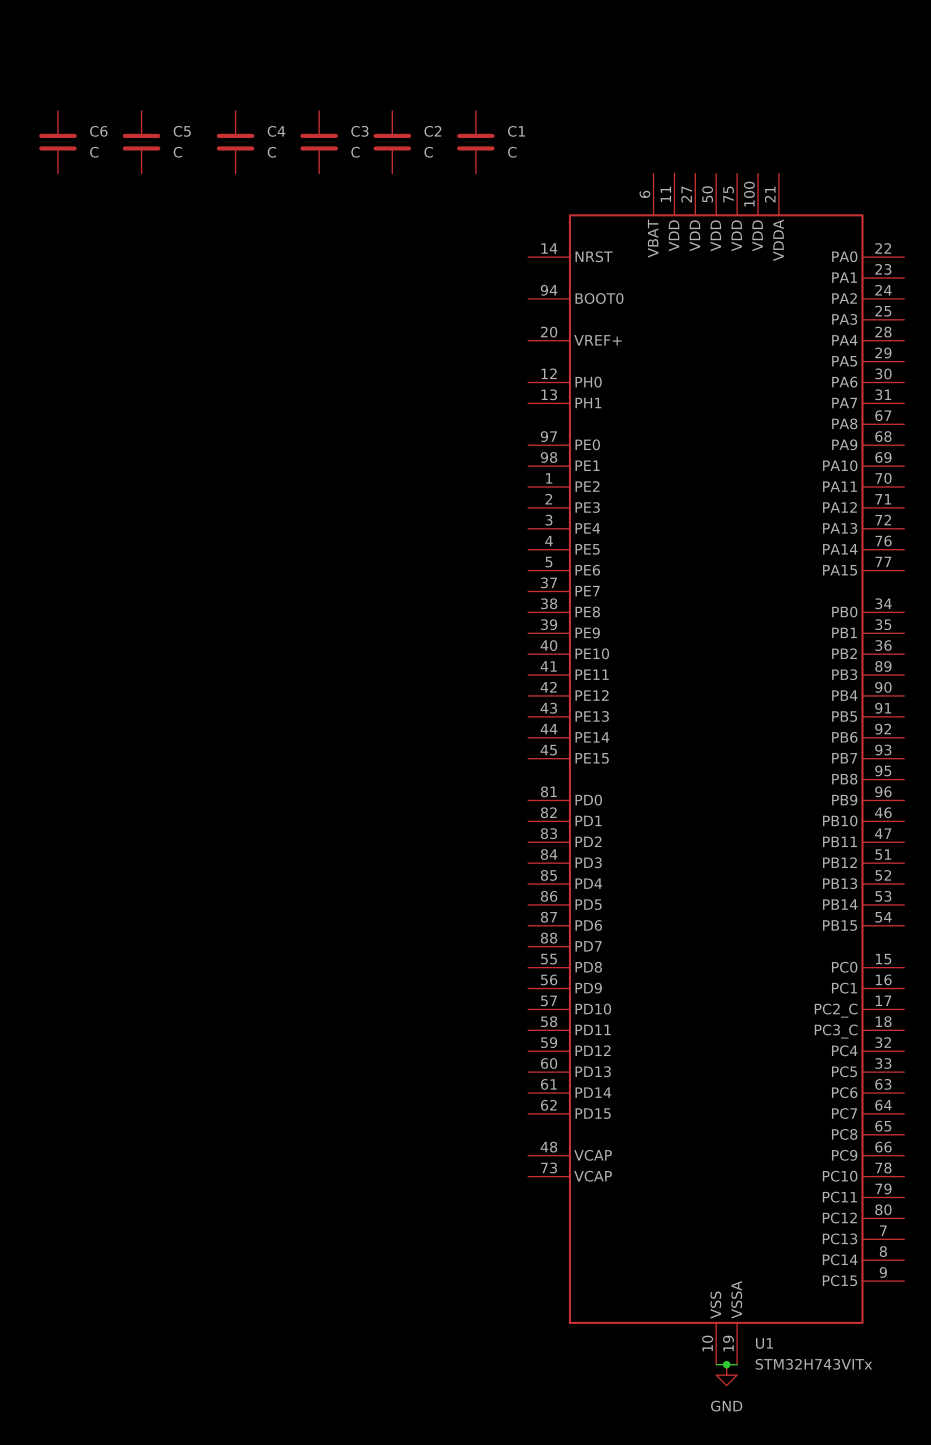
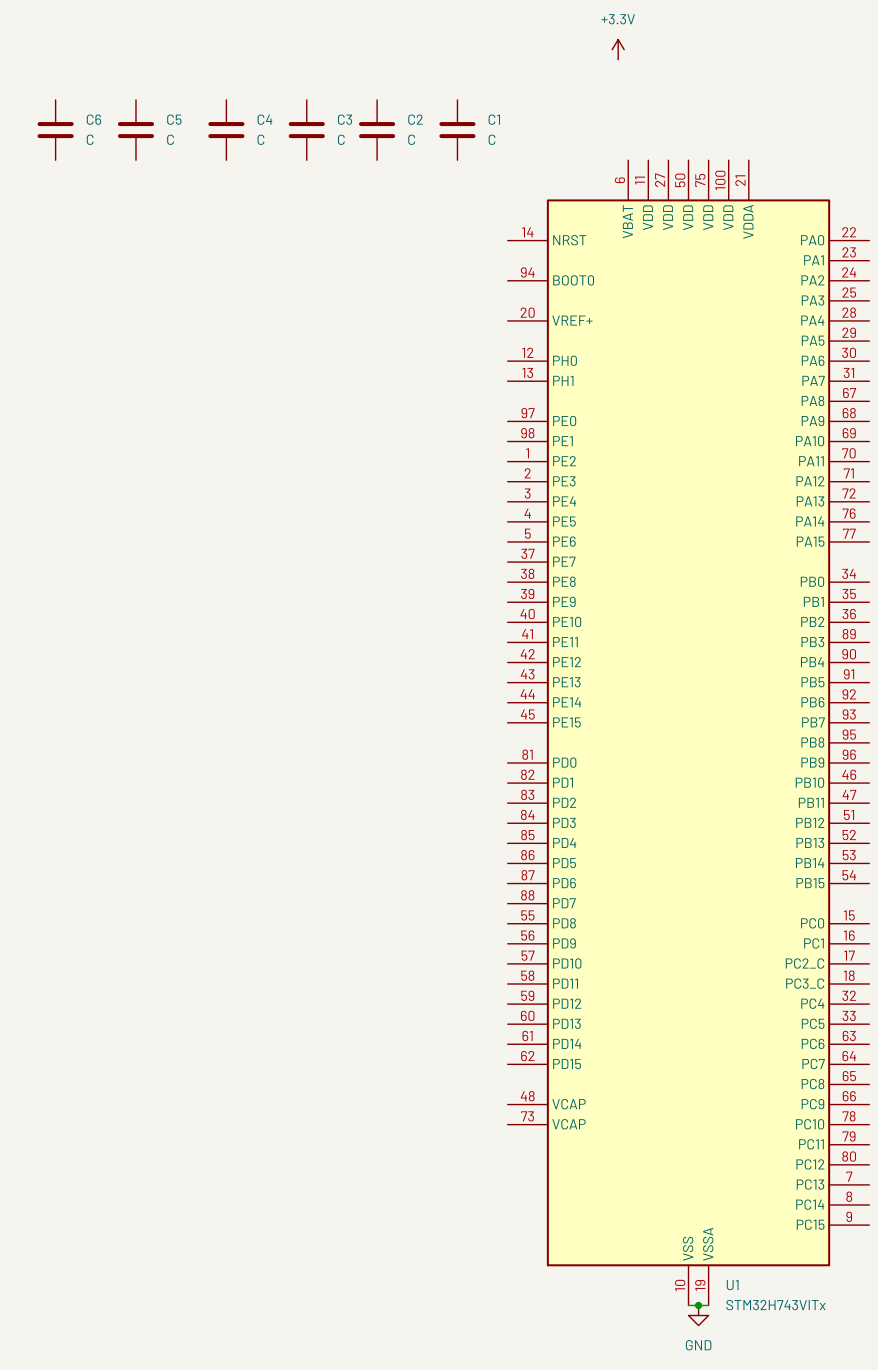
power symbol: none -> +3.3V (618, 49)

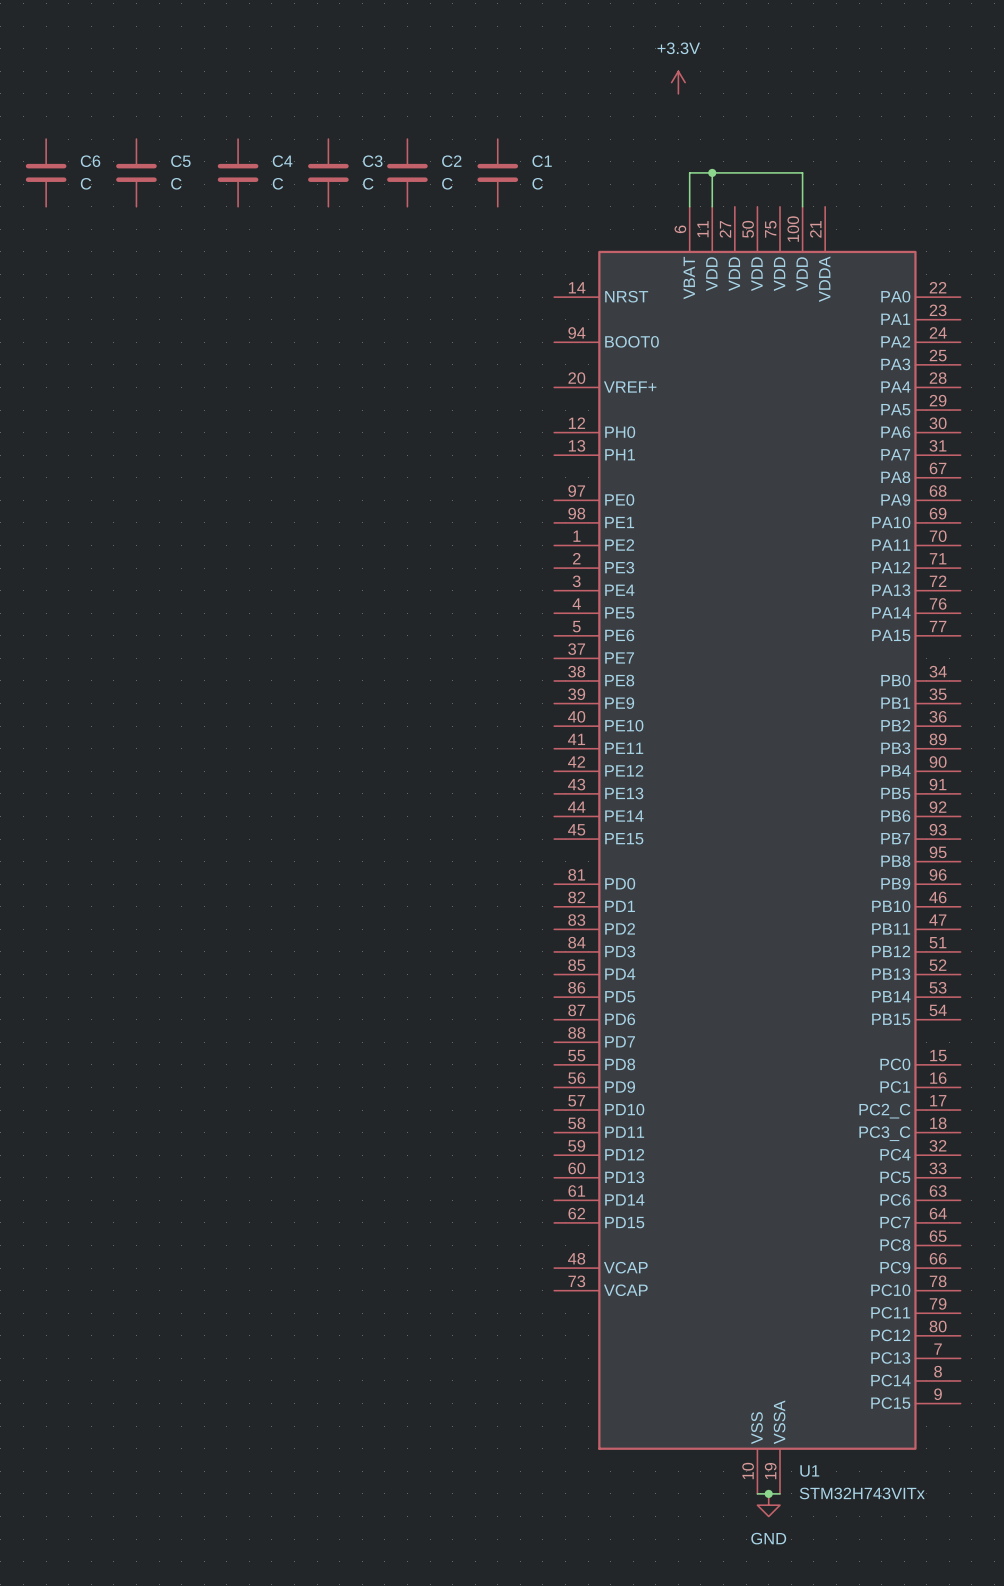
wire: none -> (712, 172) (712, 206)
junction: none -> (712, 172)
wire: none -> (689, 206) (689, 172) (802, 172) (802, 206)

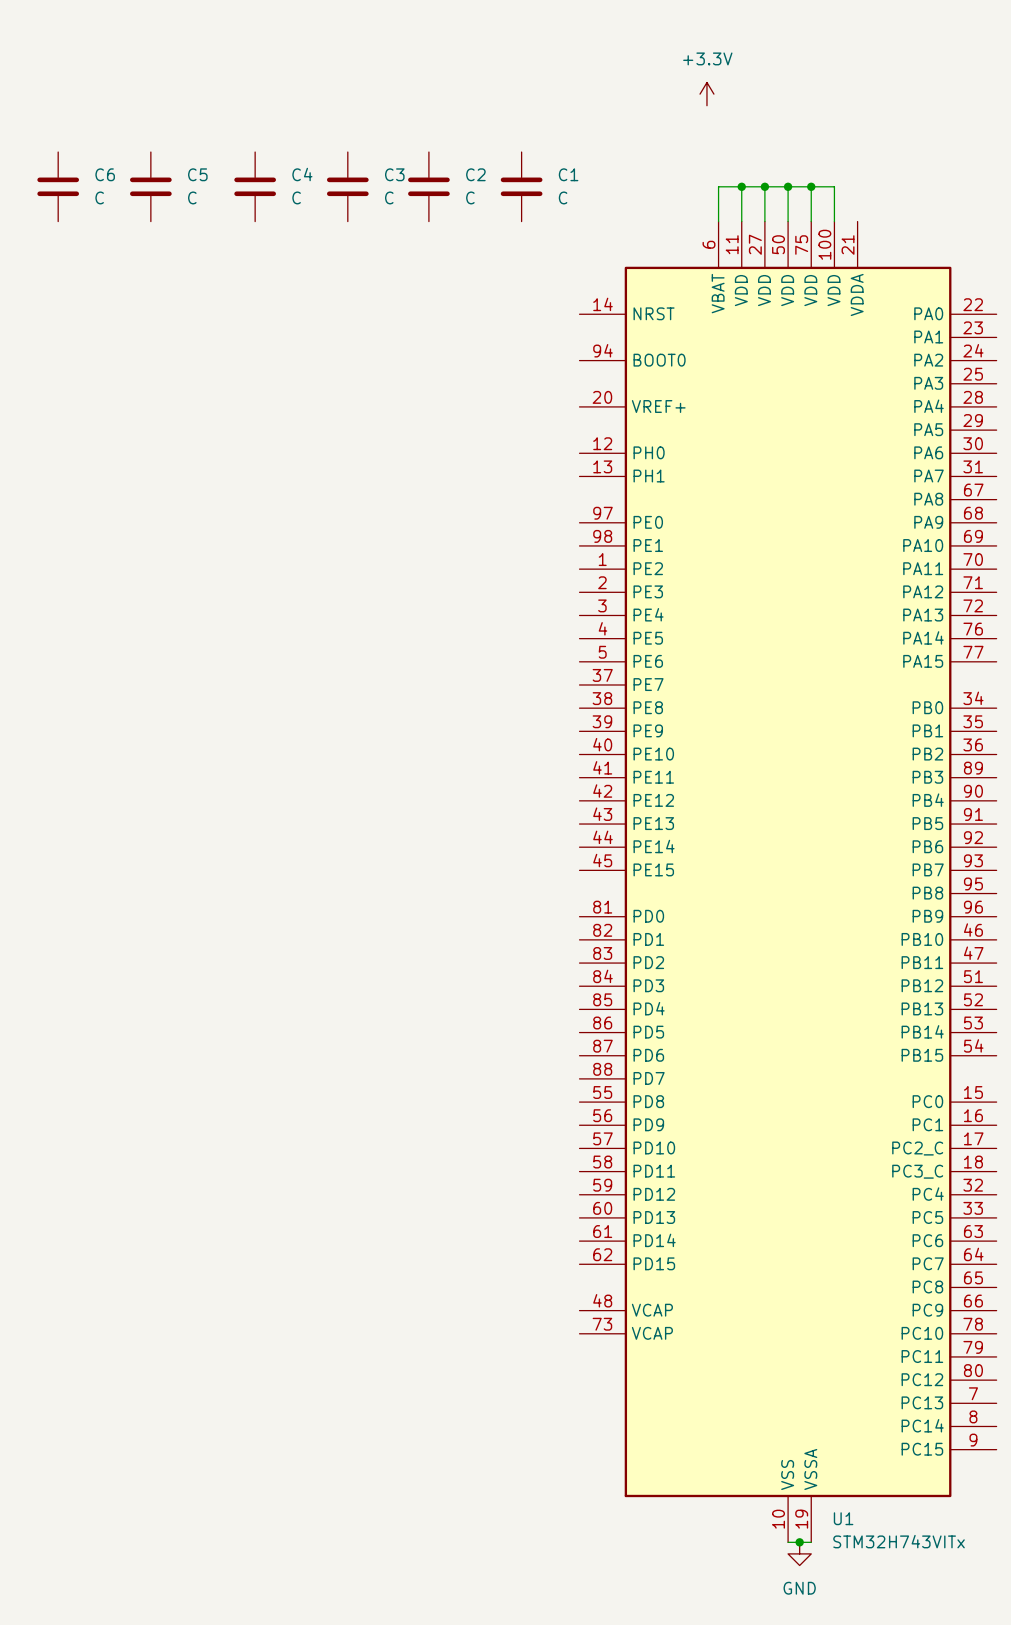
wire: none -> (764, 186) (764, 221)
junction: none -> (764, 186)
wire: none -> (788, 186) (788, 221)
junction: none -> (788, 186)
wire: none -> (811, 186) (811, 221)
junction: none -> (811, 186)

